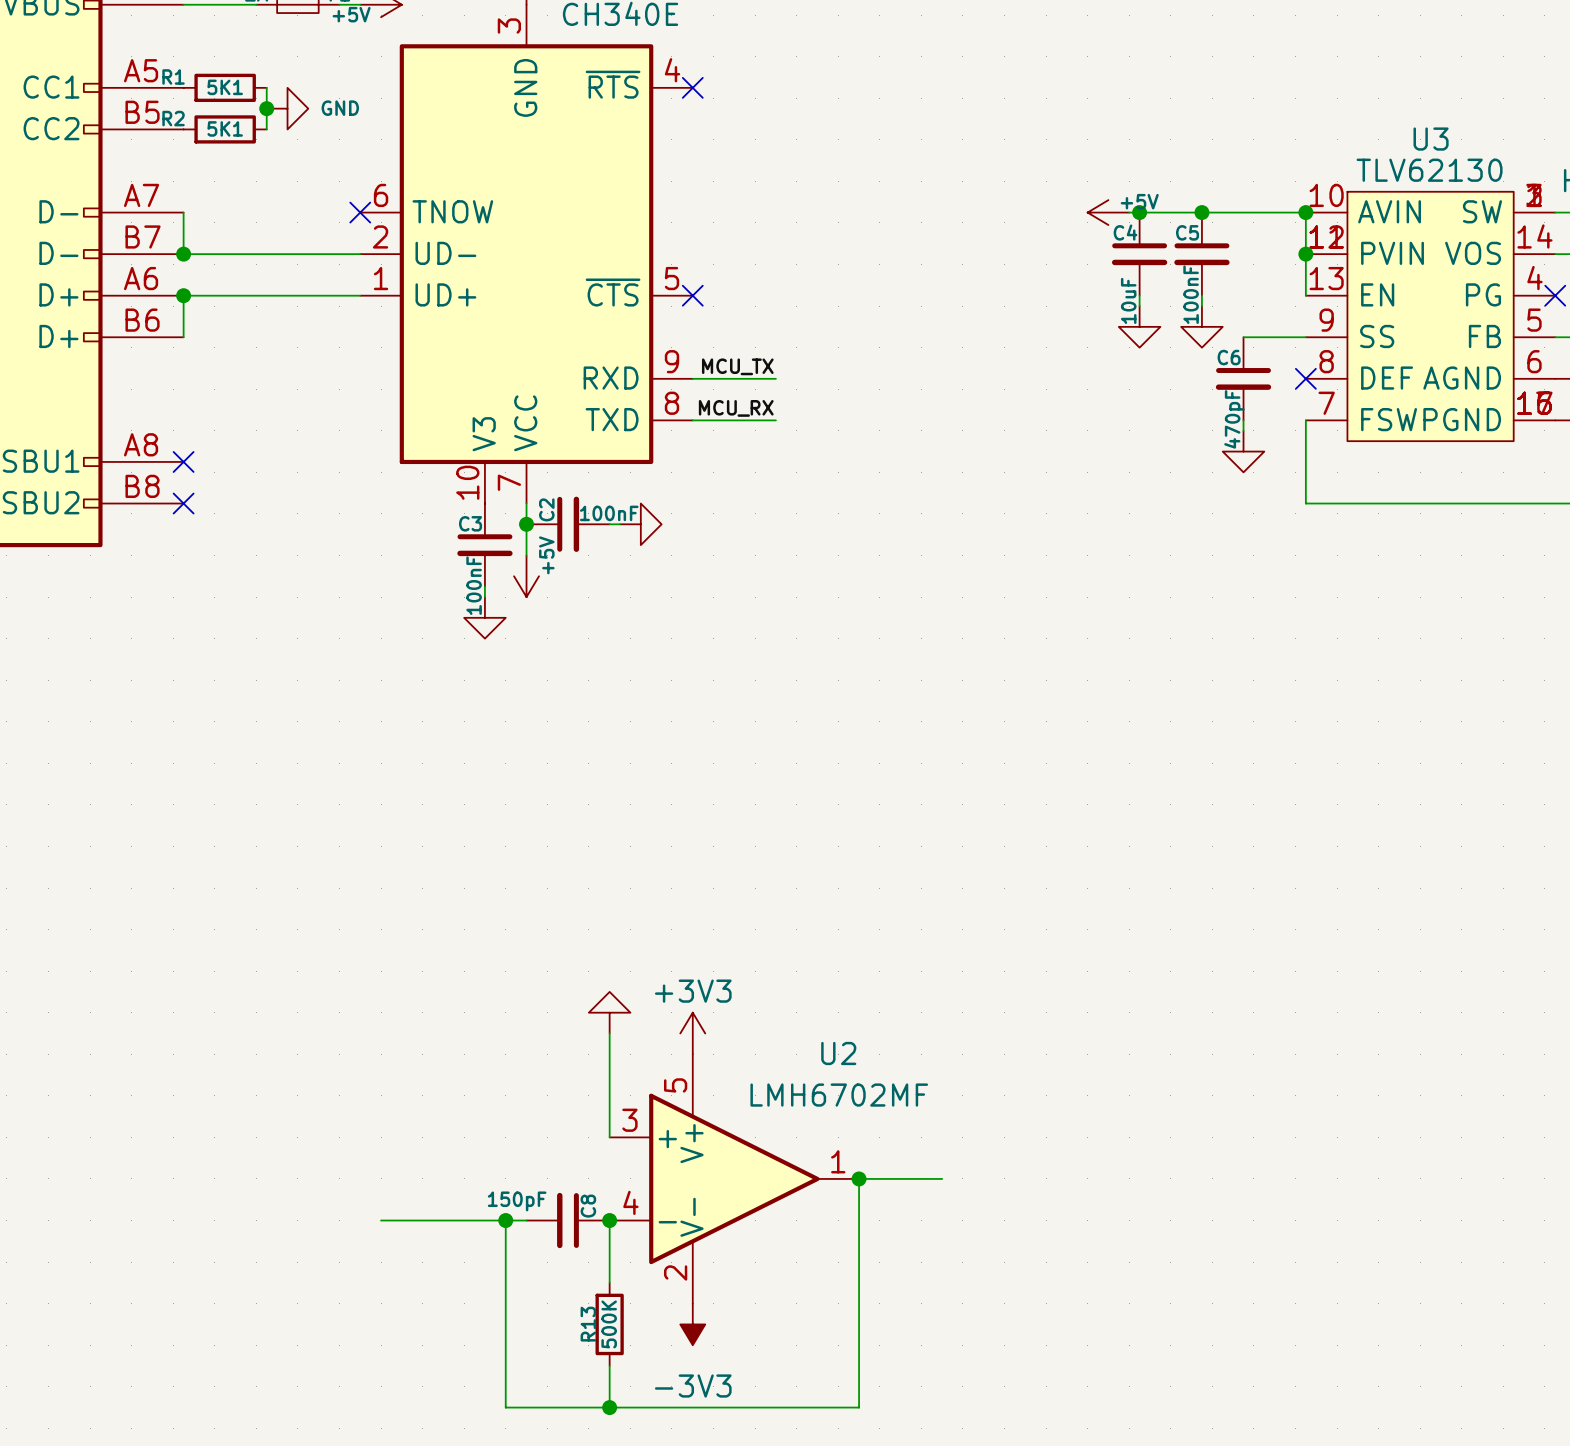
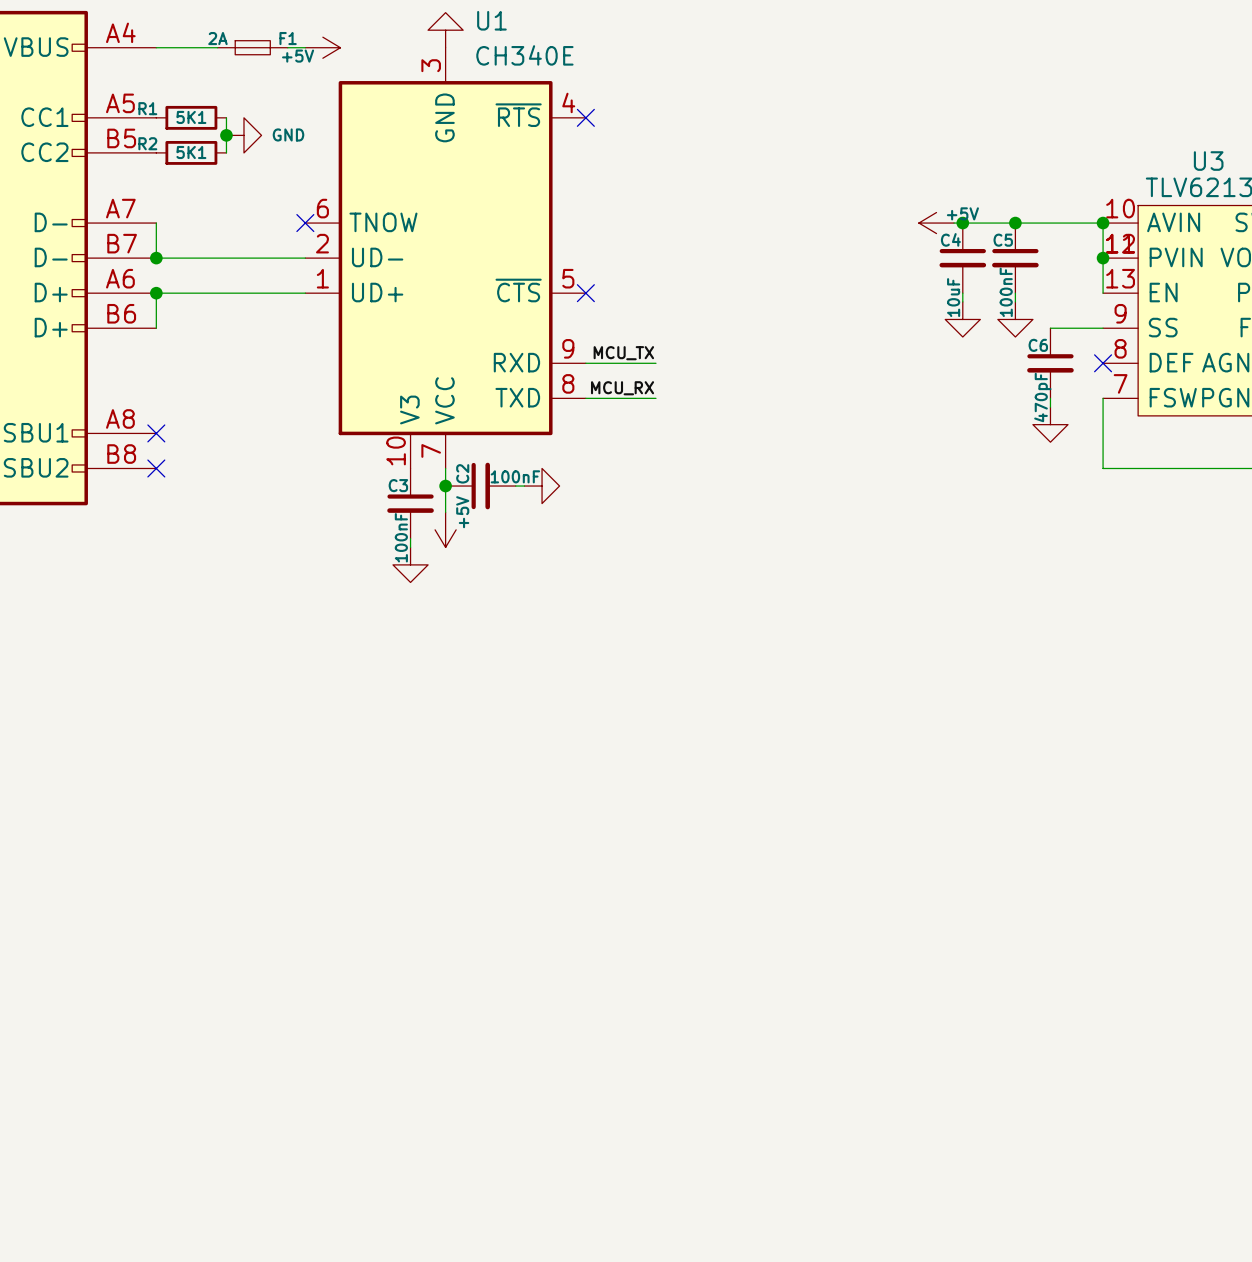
power symbol: (609, 1012) -> none
wire: (609, 1033) (609, 1137) -> none
power symbol: +3V3 (692, 1033) -> none
U2: LMH6702MF (734, 1178) -> none
junction: (859, 1178) -> none
wire: (942, 1178) (859, 1178) (859, 1407) (505, 1407) (505, 1220) -> none
wire: (381, 1220) (526, 1220) -> none
junction: (505, 1220) -> none
C8: 150pF (568, 1220) -> none
wire: (609, 1220) (609, 1282) -> none
junction: (609, 1220) -> none
R13: 500K (609, 1324) -> none
power symbol: -3V3 (692, 1324) -> none
wire: (609, 1366) (609, 1407) -> none
junction: (609, 1407) -> none

